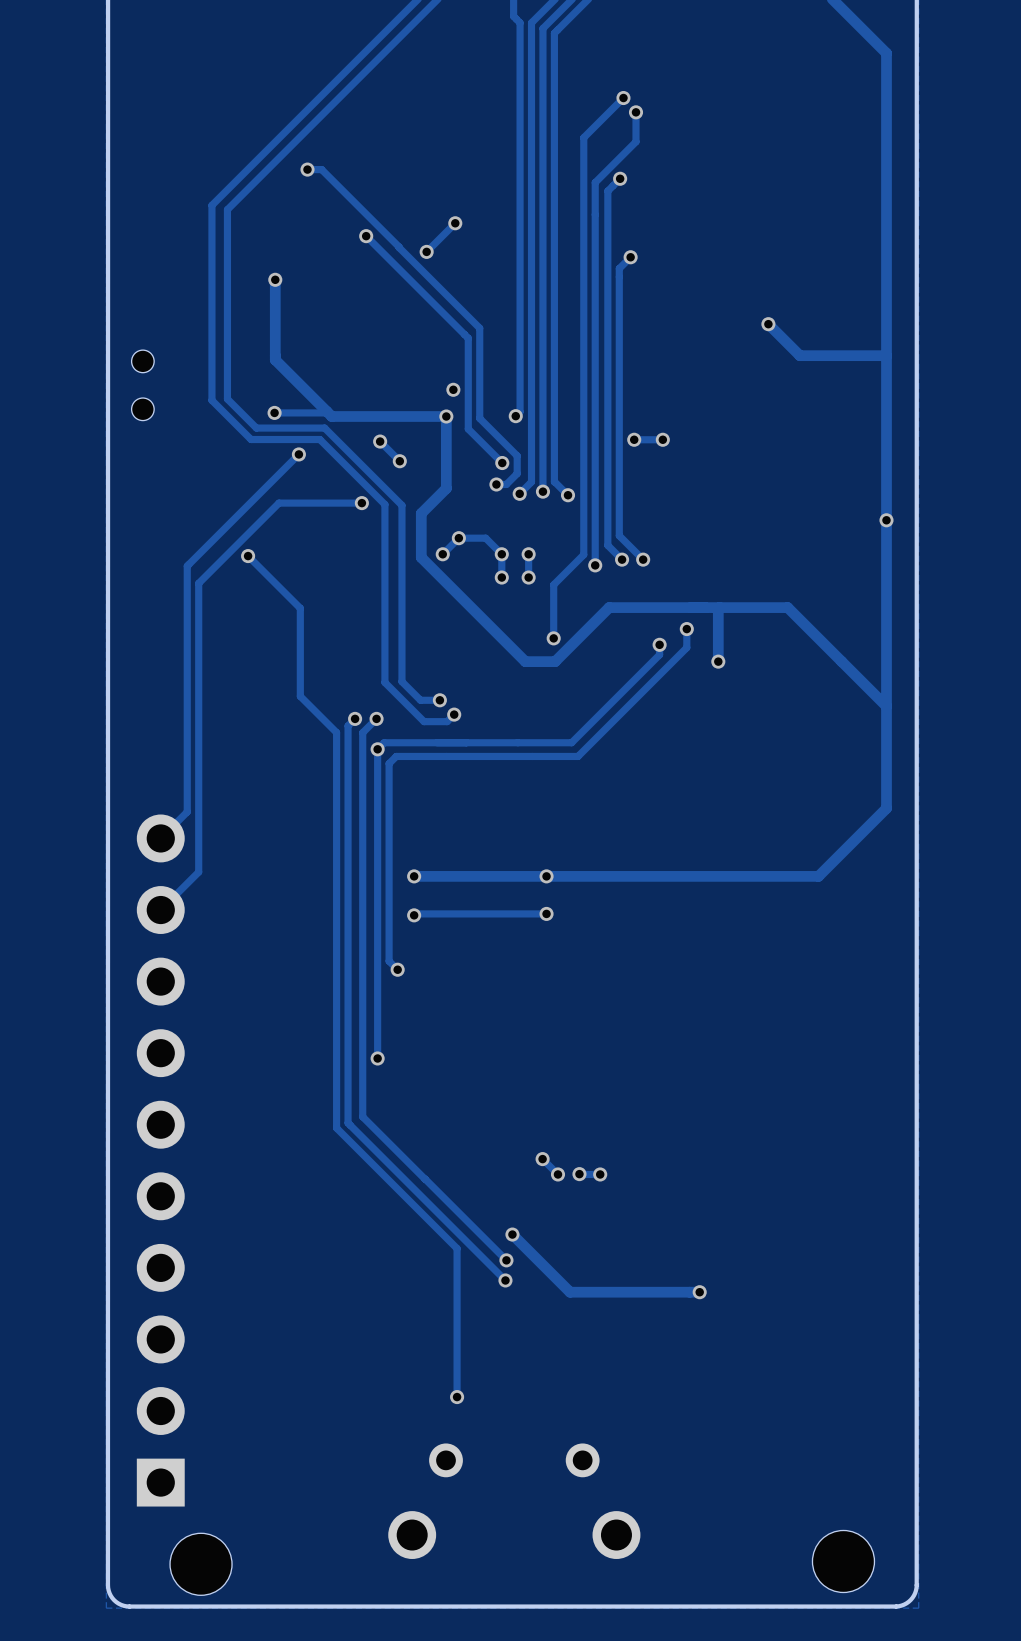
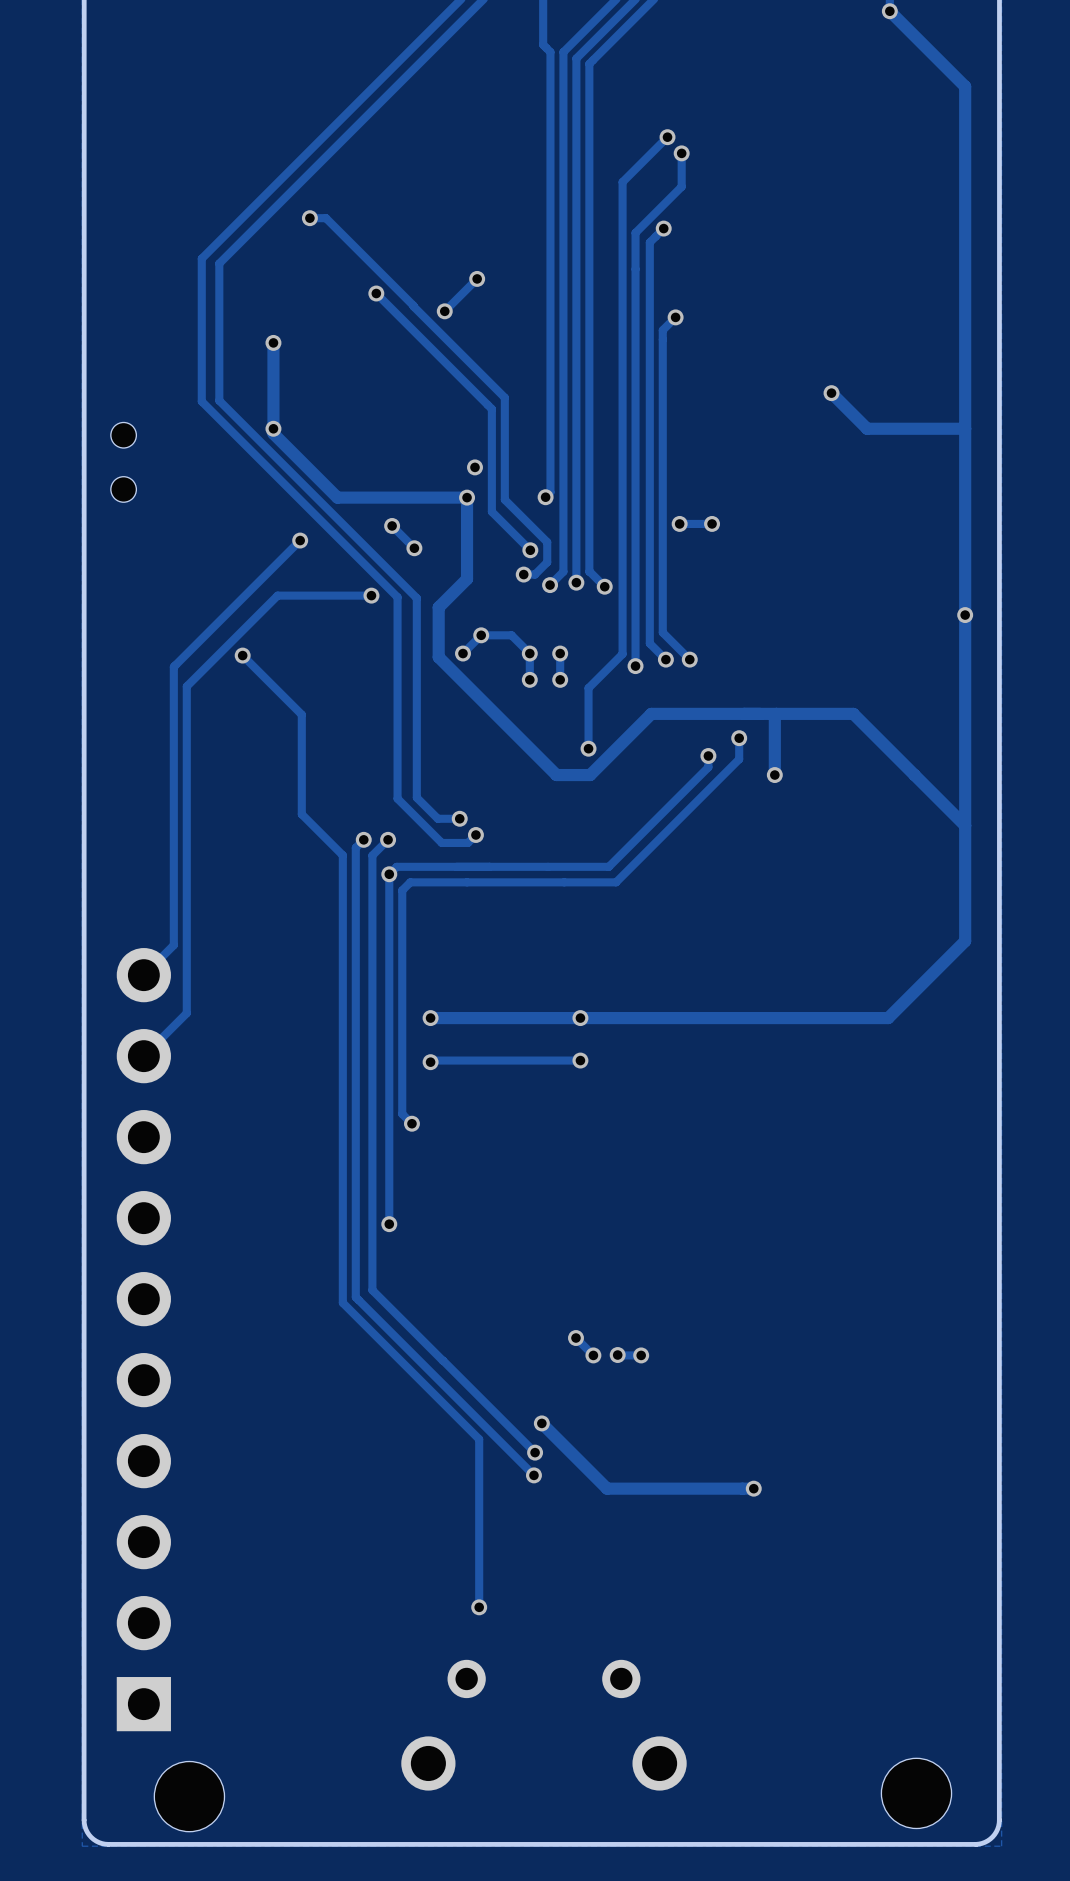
track: (227, 330) (227, 399) (256, 428) (324, 428) -> (219, 400) (329, 510)
track: (211, 331) (211, 400) (251, 439) (319, 439) -> (201, 401) (323, 523)
track: (326, 411) (274, 412) -> none
via position: (274, 412) -> (273, 428)

